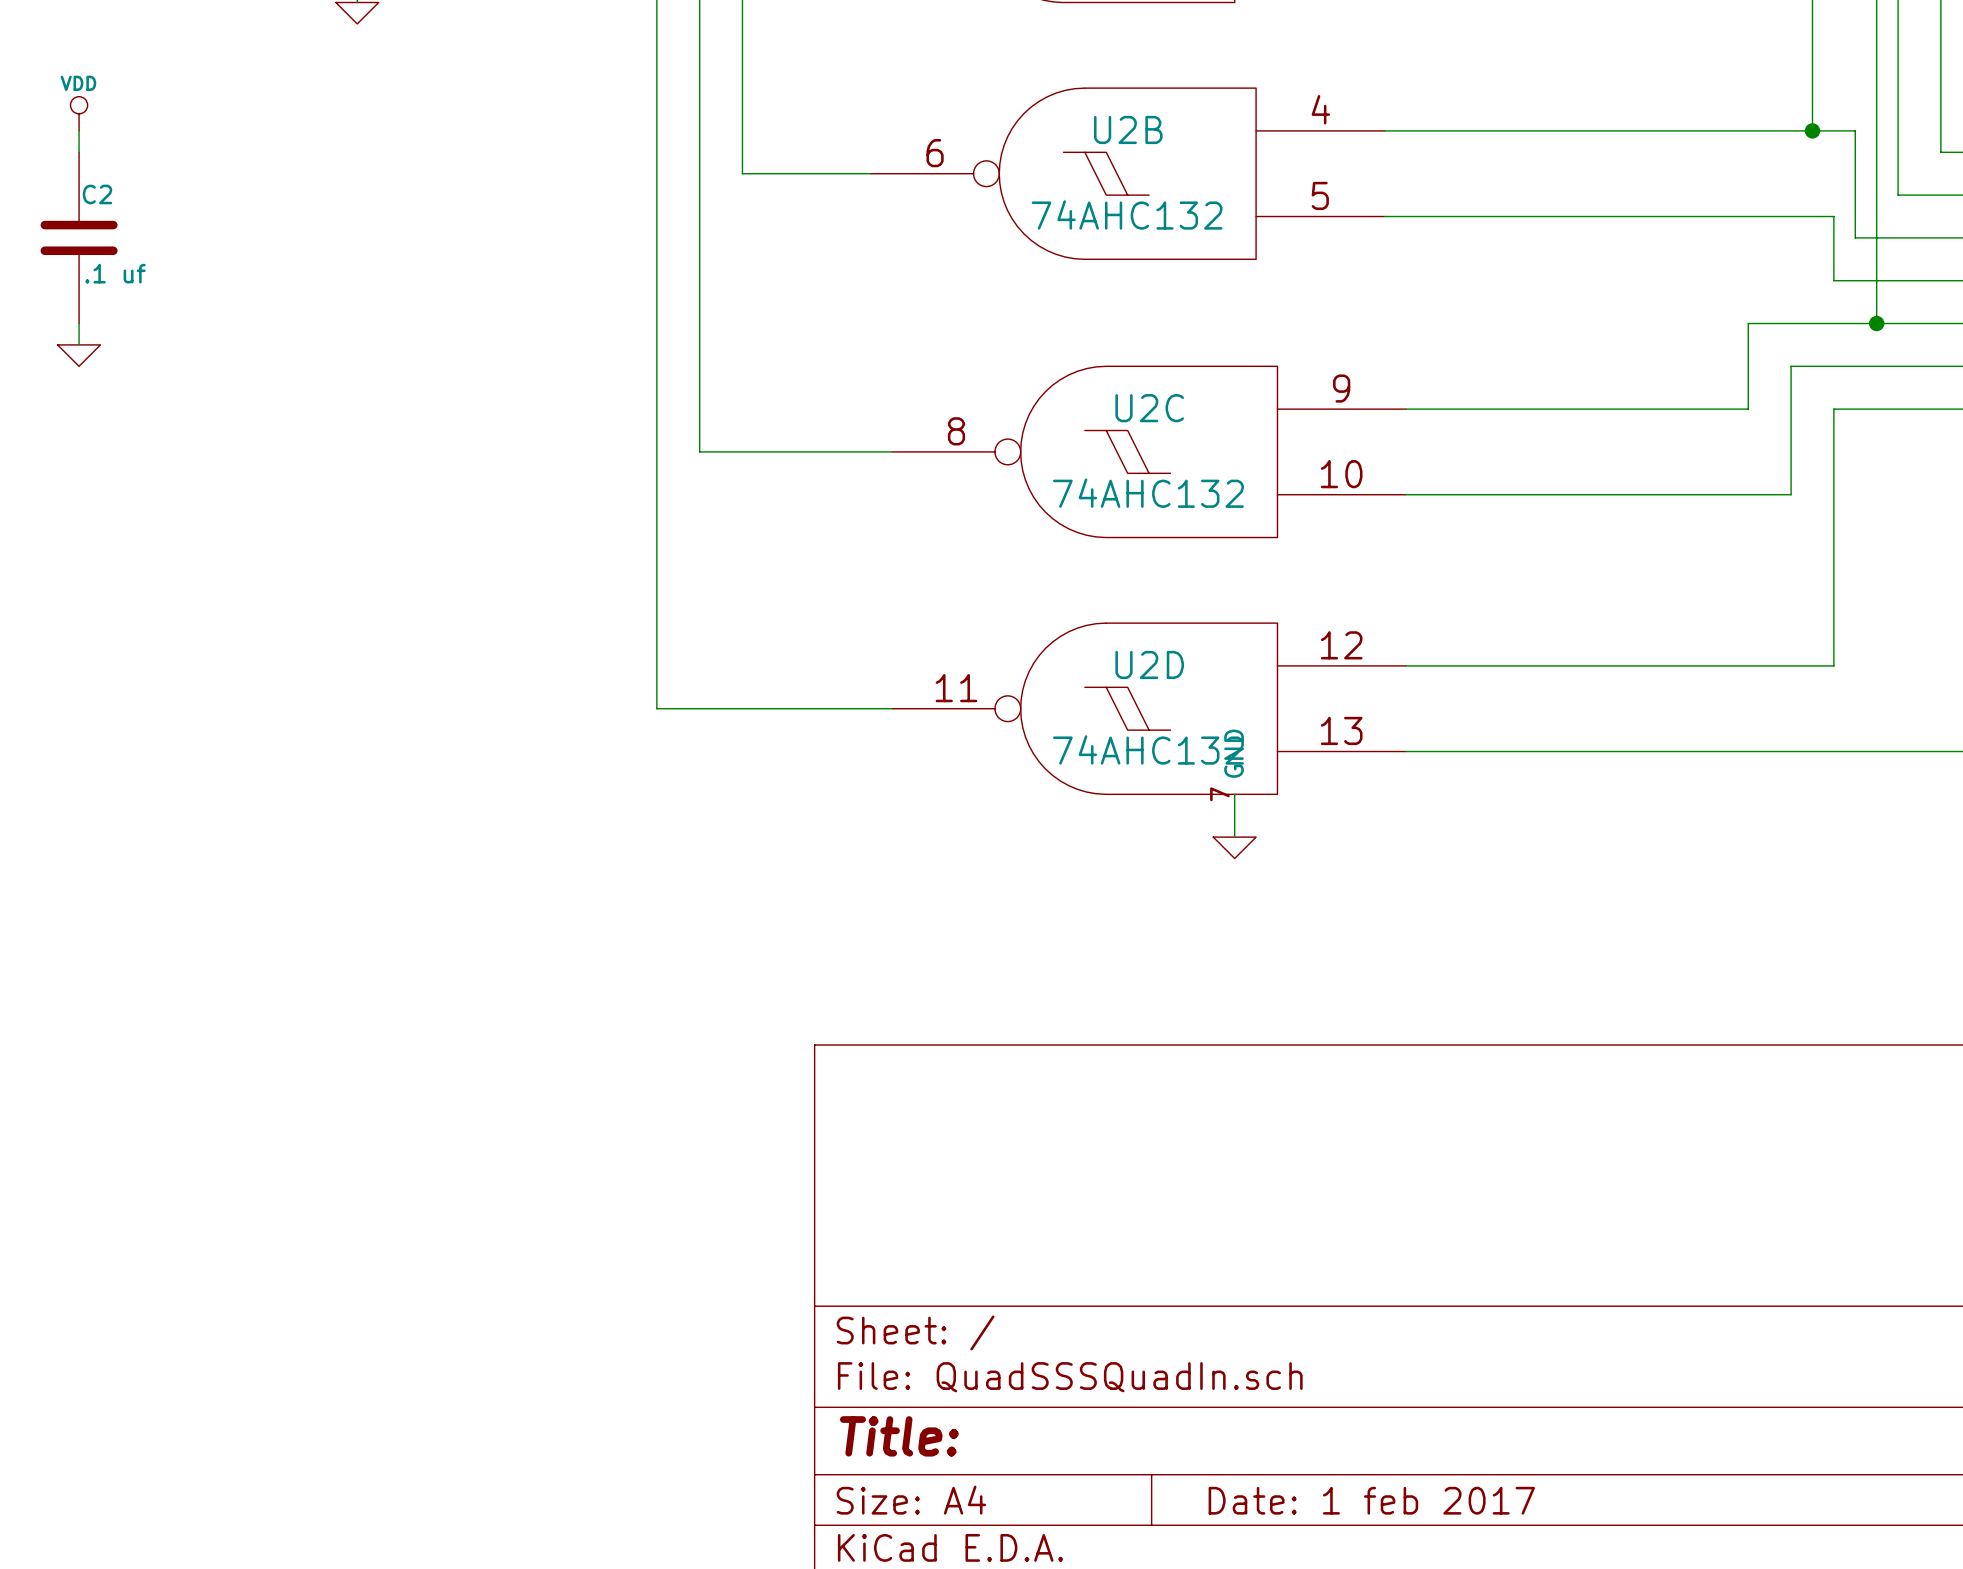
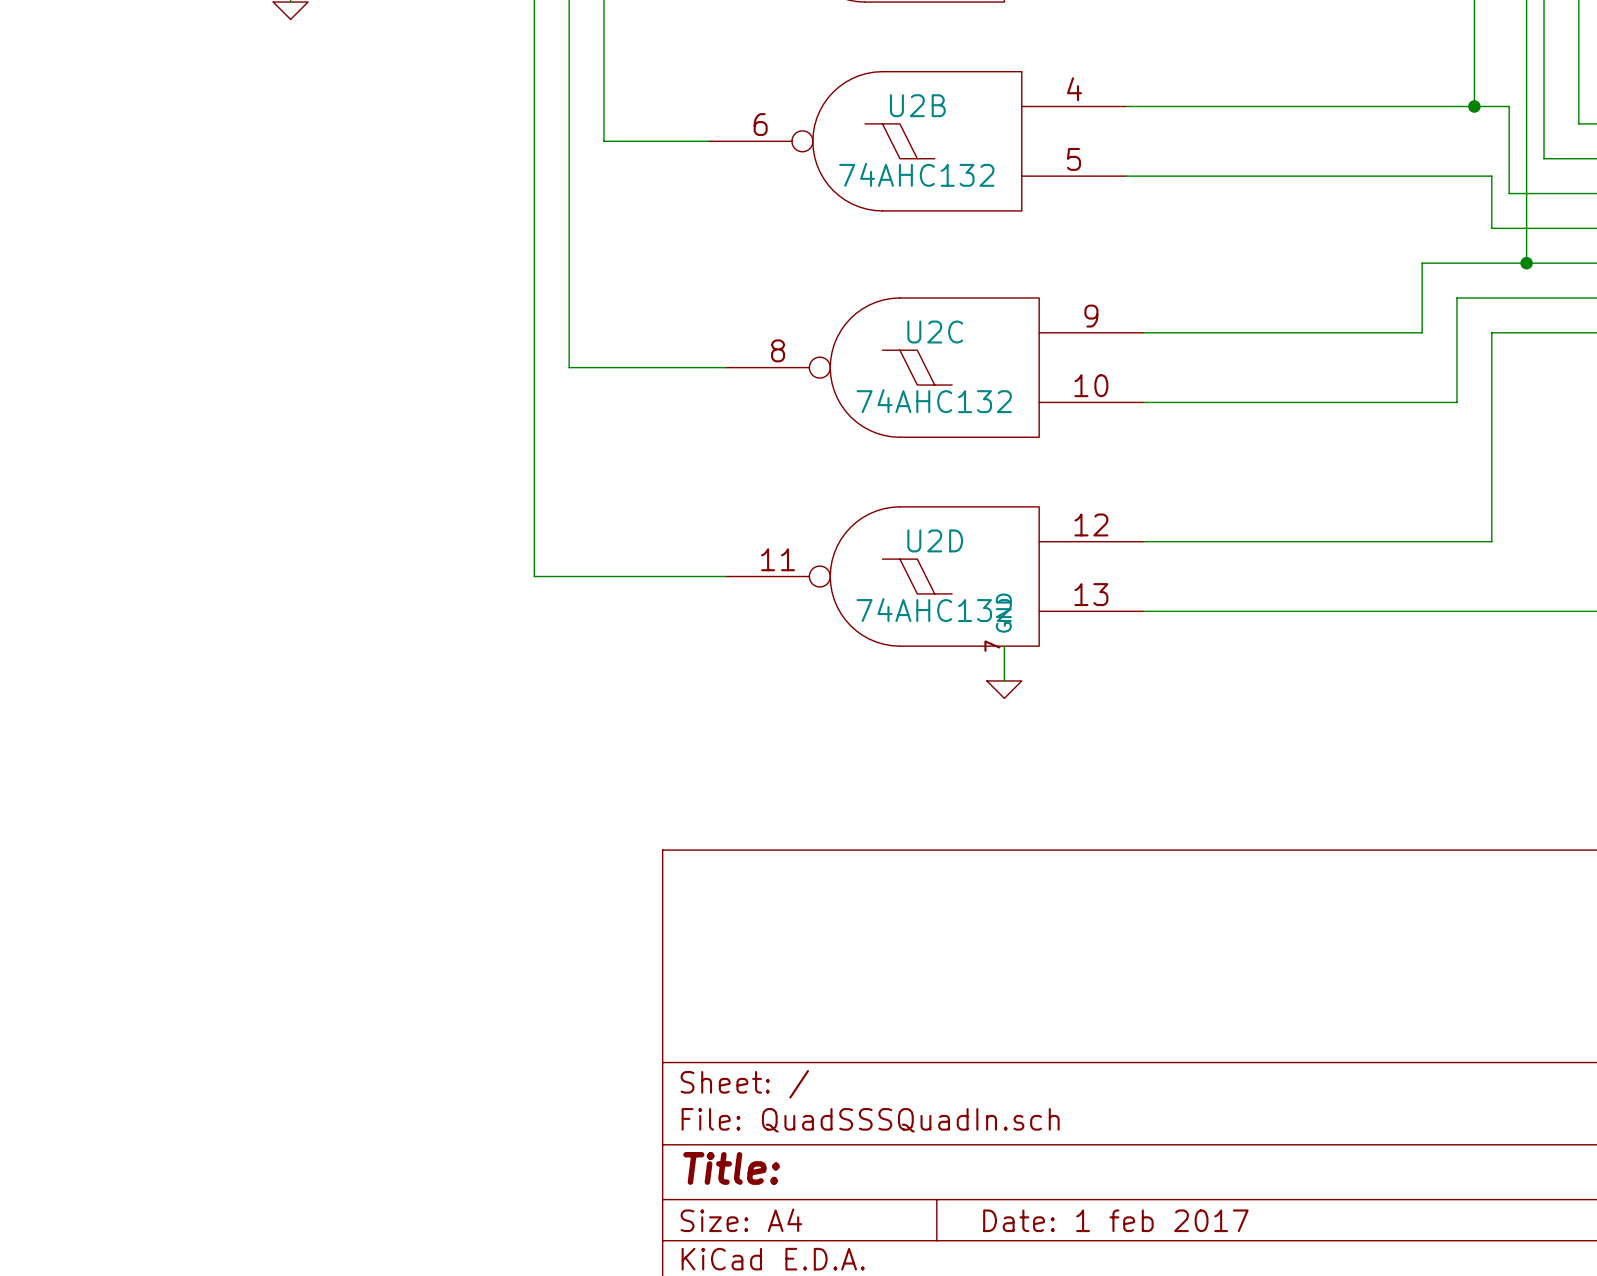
power symbol: VDD (79, 113) -> none
wire: (79, 130) (79, 152) -> none
C2: .1 uf (79, 237) -> none
wire: (79, 323) (79, 344) -> none
power symbol: (79, 355) -> none

